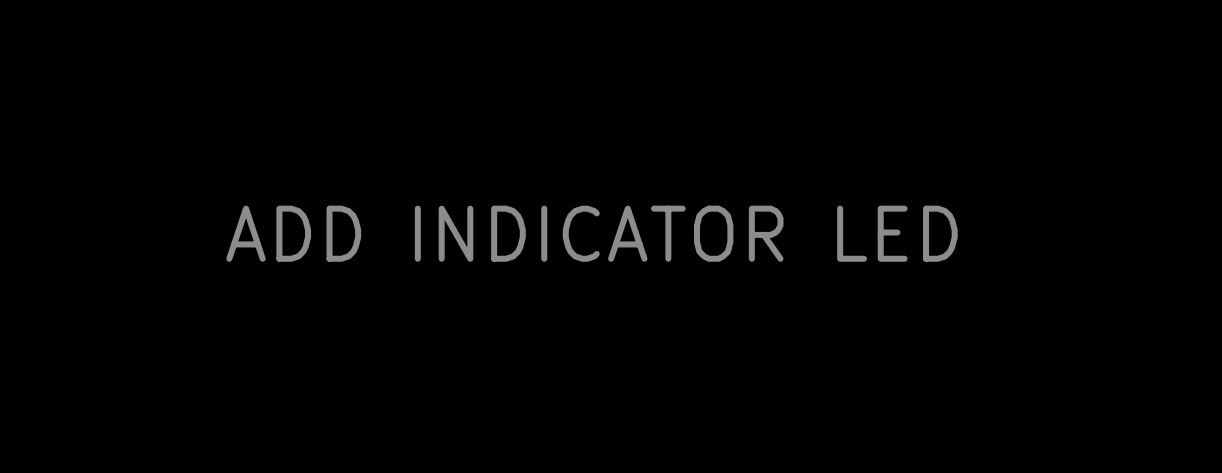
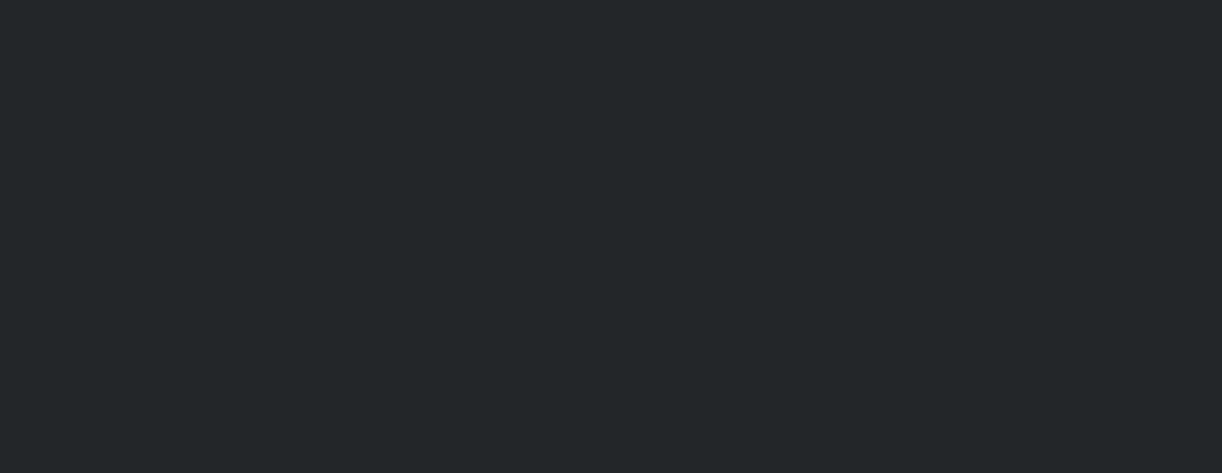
text: ADD INDICATOR LED (591, 233) -> none

